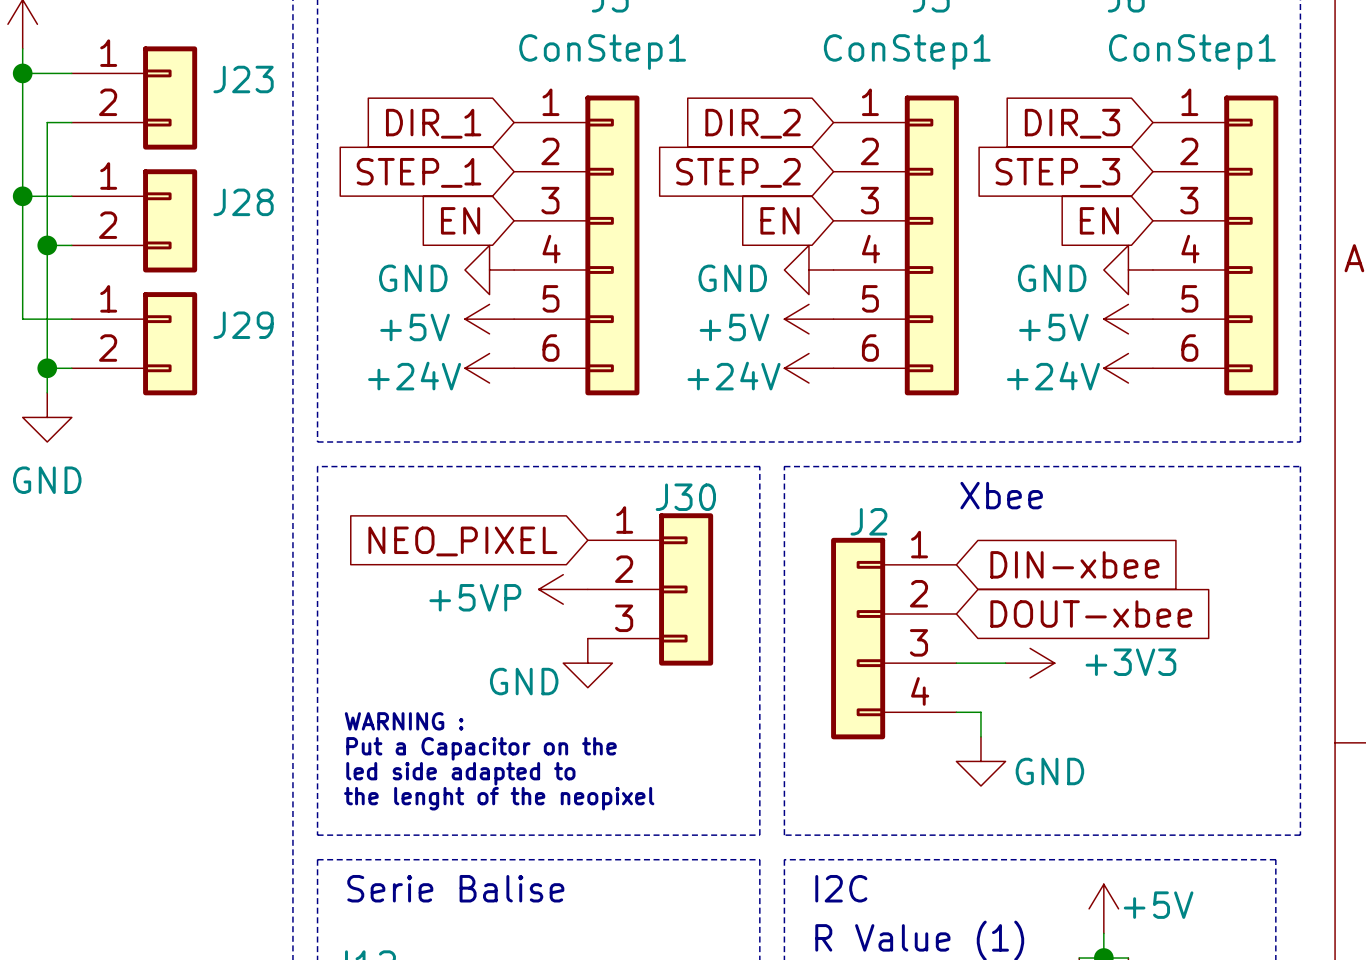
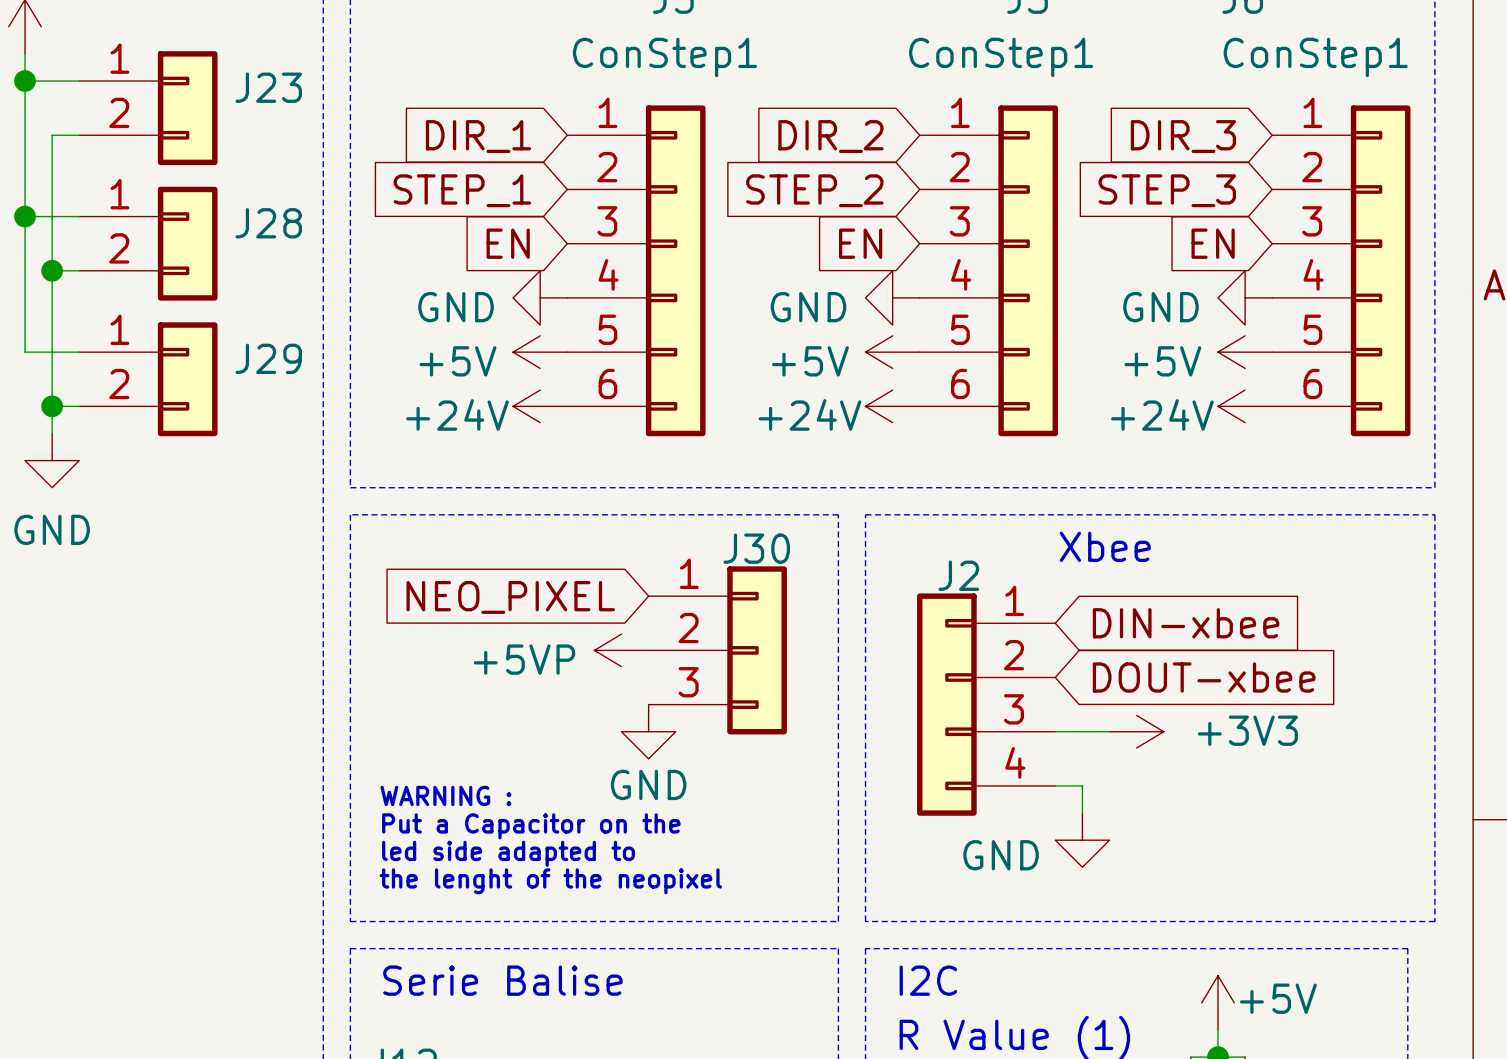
power symbol text position: GND (524, 681) -> GND (648, 784)
power symbol text position: GND (1049, 771) -> GND (1001, 855)

